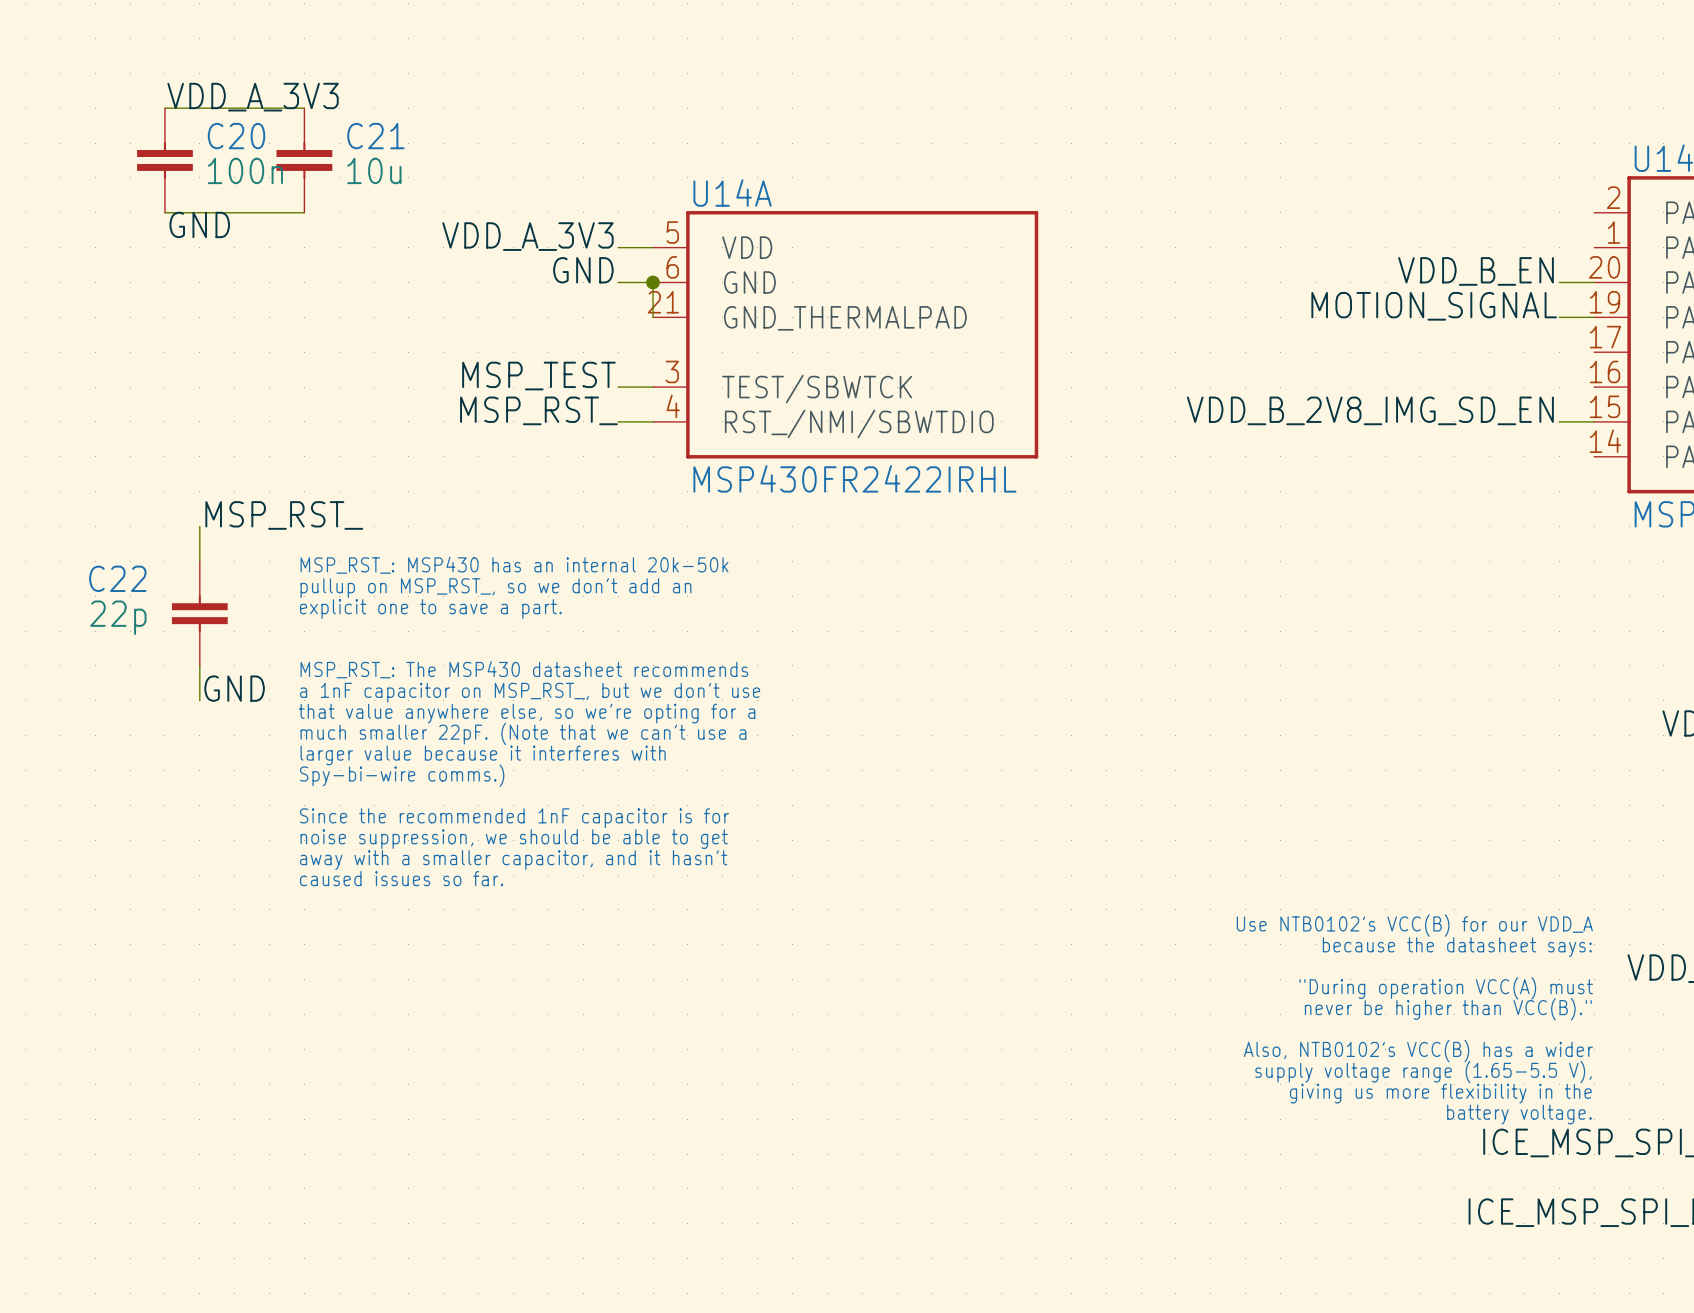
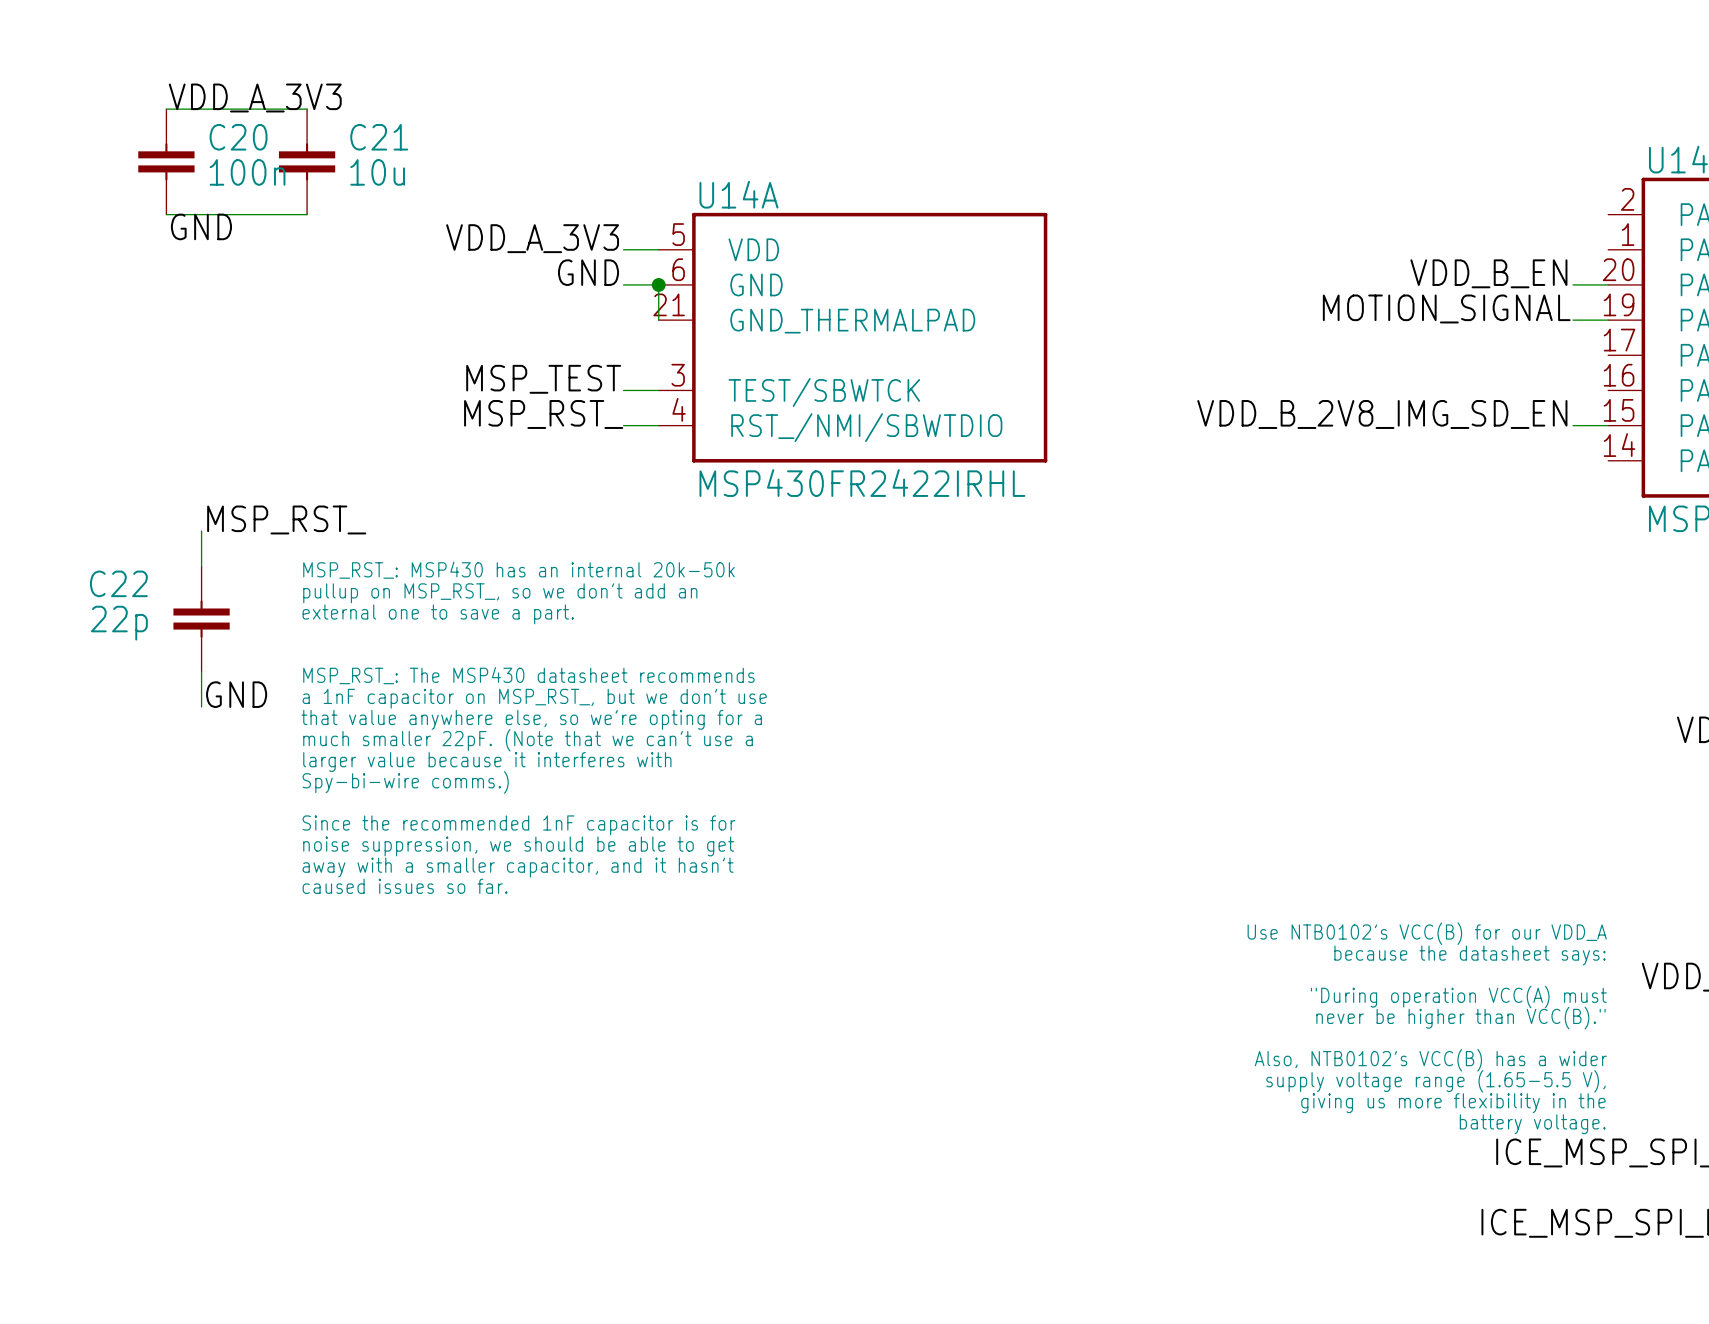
text: explicit one to save a part. (430, 609) -> external one to save a part. (438, 614)

